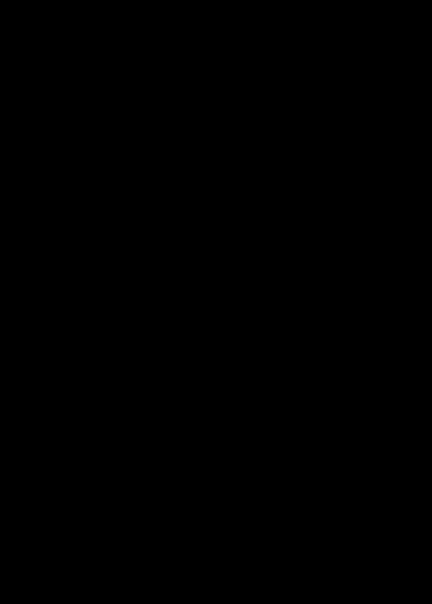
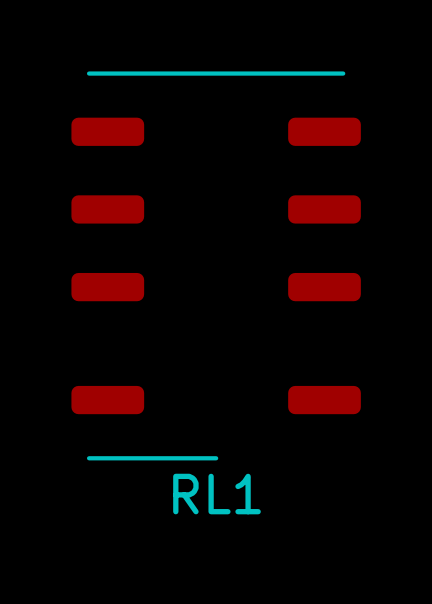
RL1: none -> (216, 265)

